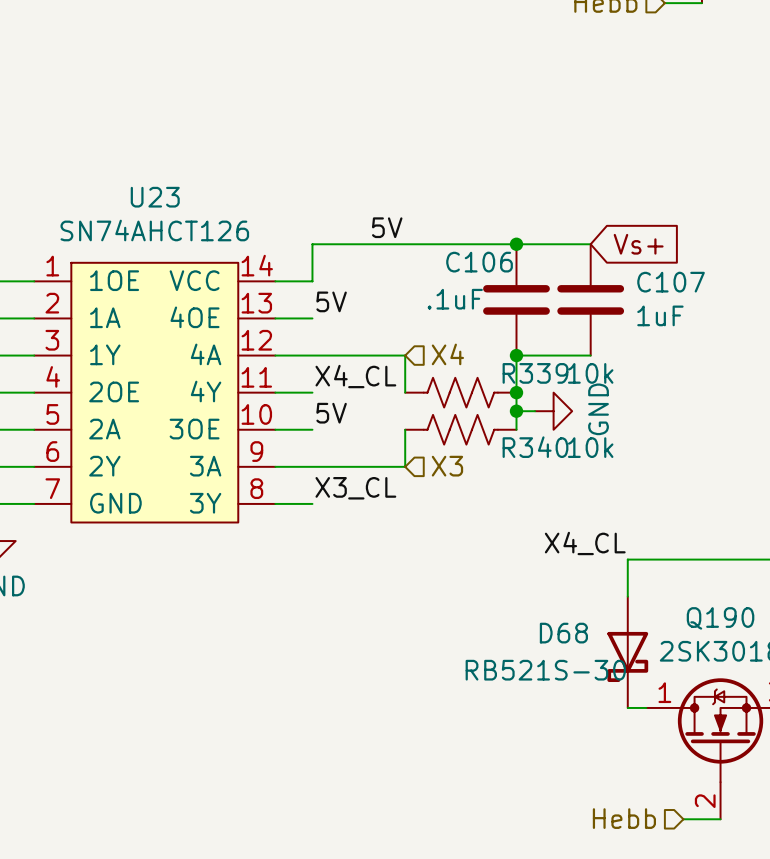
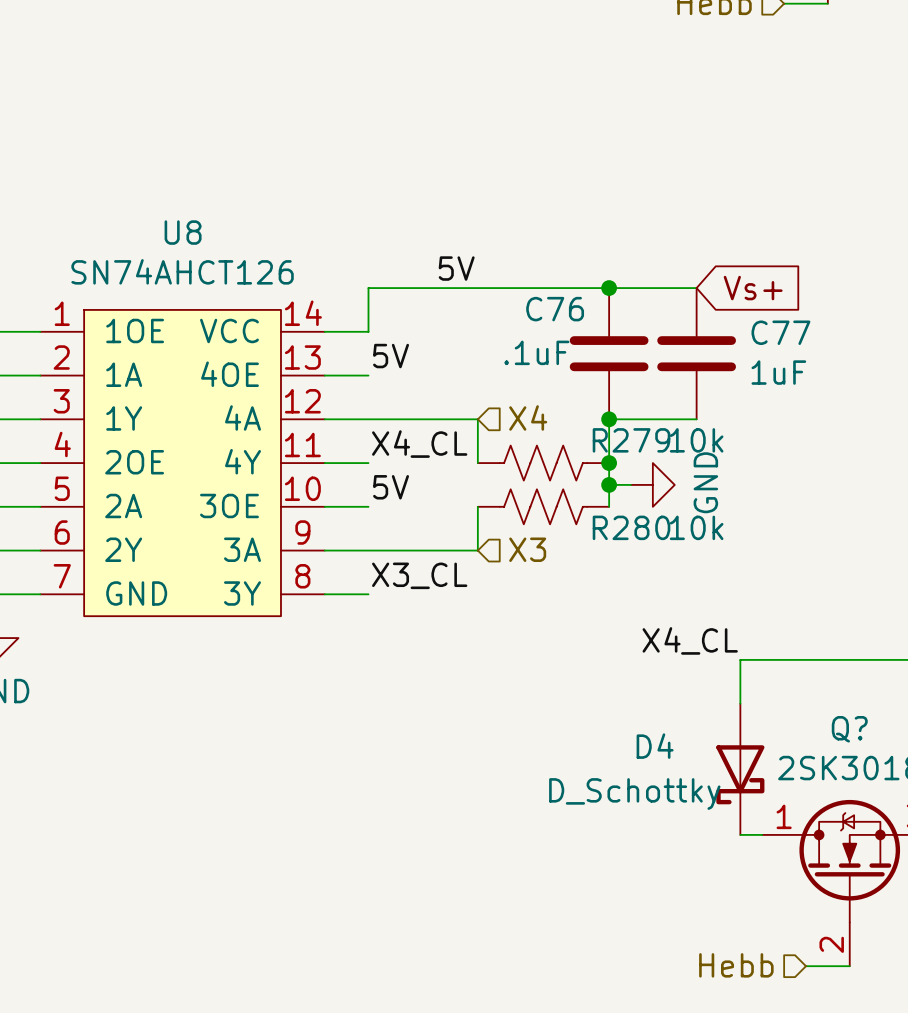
U23 name: U23 (155, 197) -> U8 (183, 232)
C106 name: C106 (479, 262) -> C76 (555, 309)
C107 name: C107 (671, 282) -> C77 (780, 332)
R339 name: R339 (535, 373) -> R279 (631, 440)
R340 name: R340 (535, 447) -> R280 (631, 527)
Q190 name: Q190 (720, 618) -> Q? (849, 729)
D68 name: D68 (563, 633) -> D4 (655, 746)
D68 value: RB521S-30 (545, 670) -> D_Schottky (634, 794)

